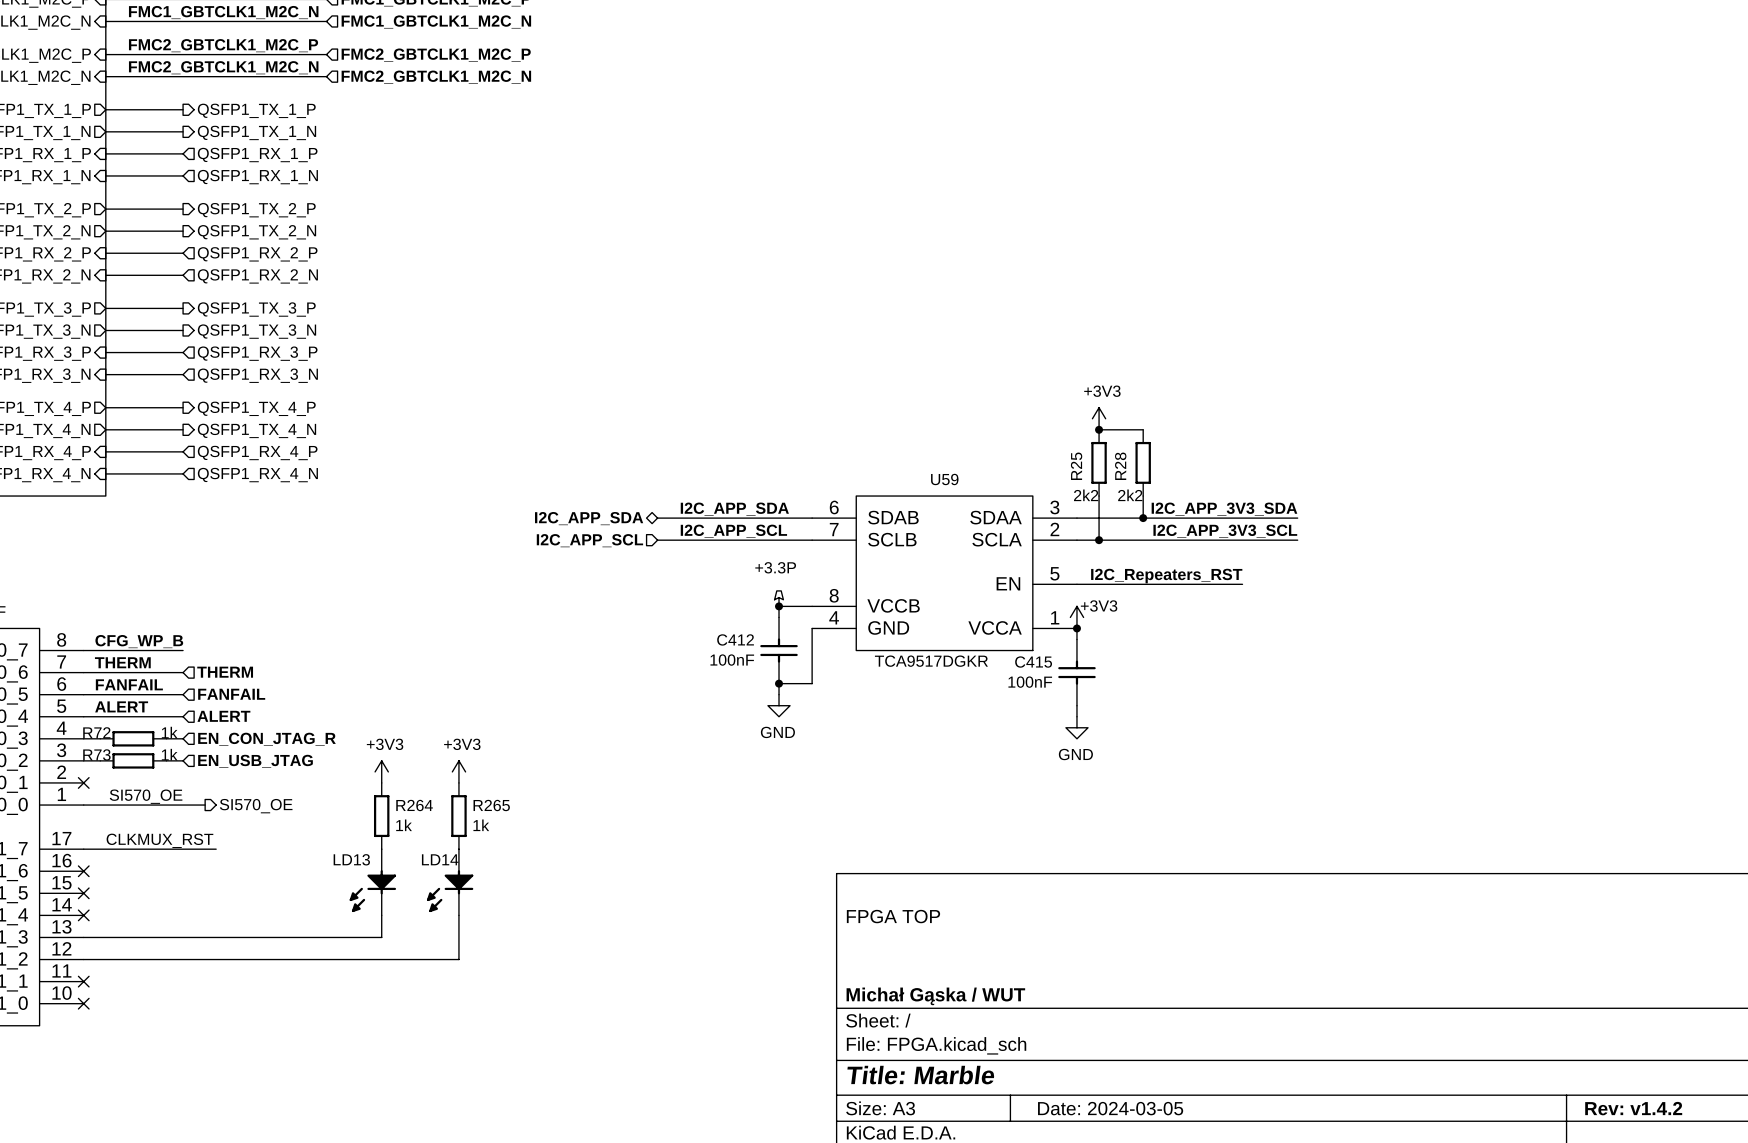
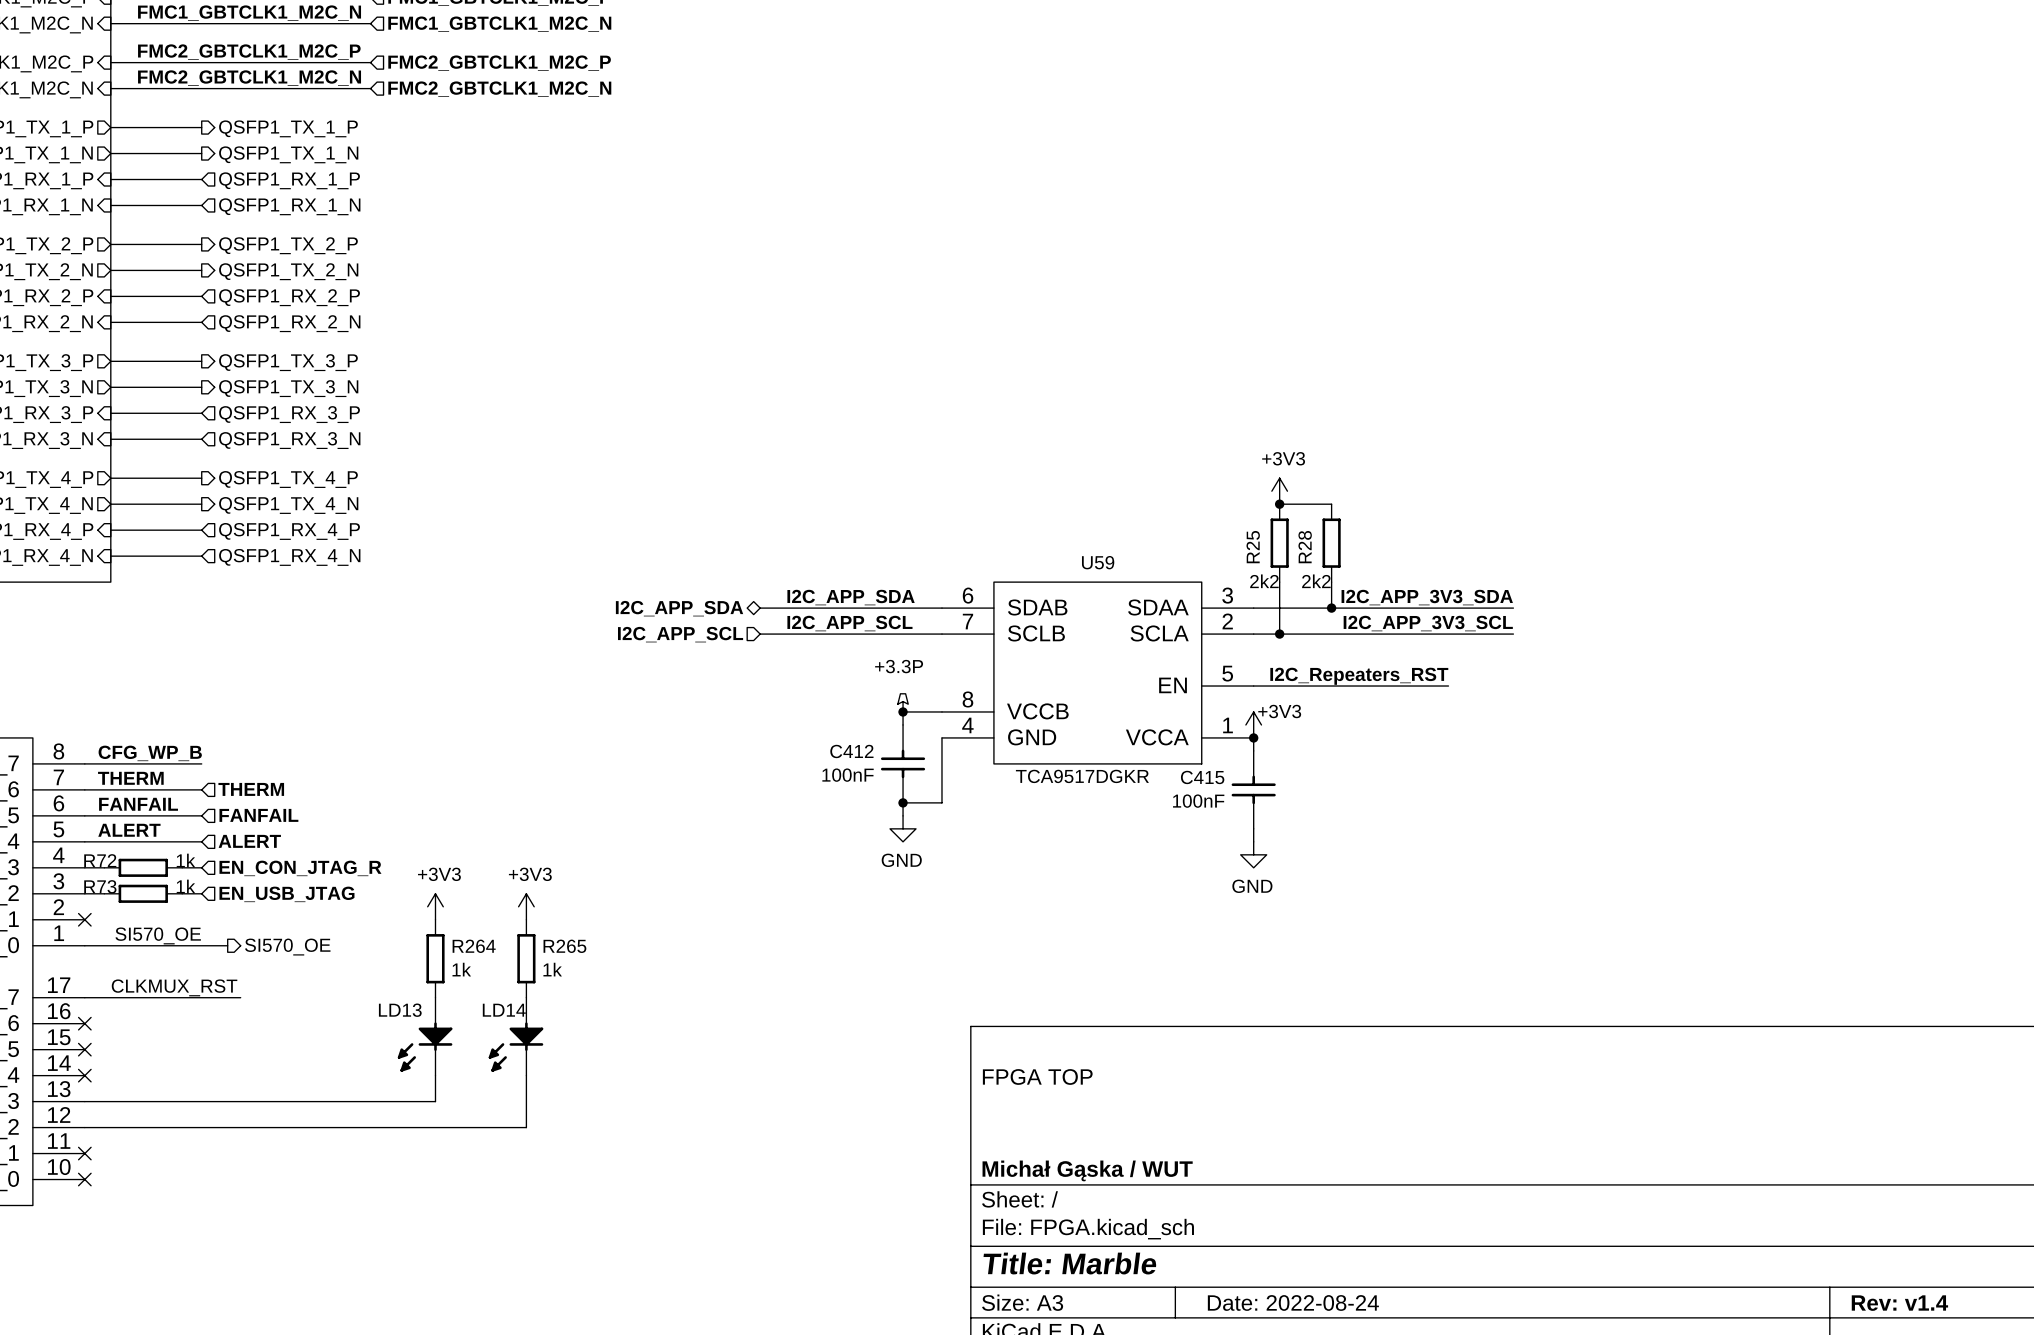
title block: Date: 2024-03-05 (1110, 1108) -> Date: 2022-08-24 (1293, 1302)
title block: Rev: v1.4.2 (1633, 1108) -> Rev: v1.4 (1899, 1303)

